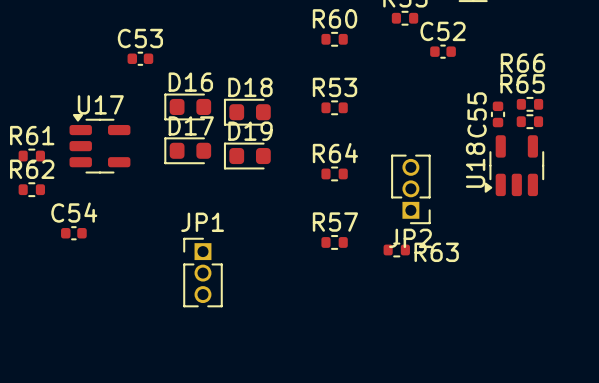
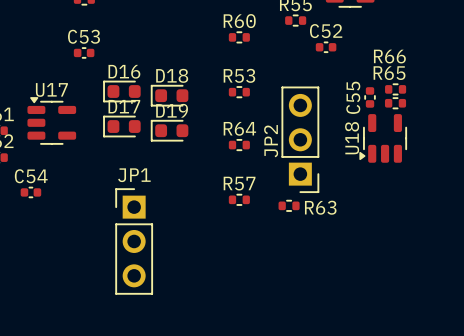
JP2 footprint: [391, 154, 431, 225] -> [281, 86, 320, 193]
JP1 footprint: [183, 237, 223, 308] -> [115, 188, 153, 295]
JP2 name position: JP2 (410, 238) -> JP2 (271, 141)

